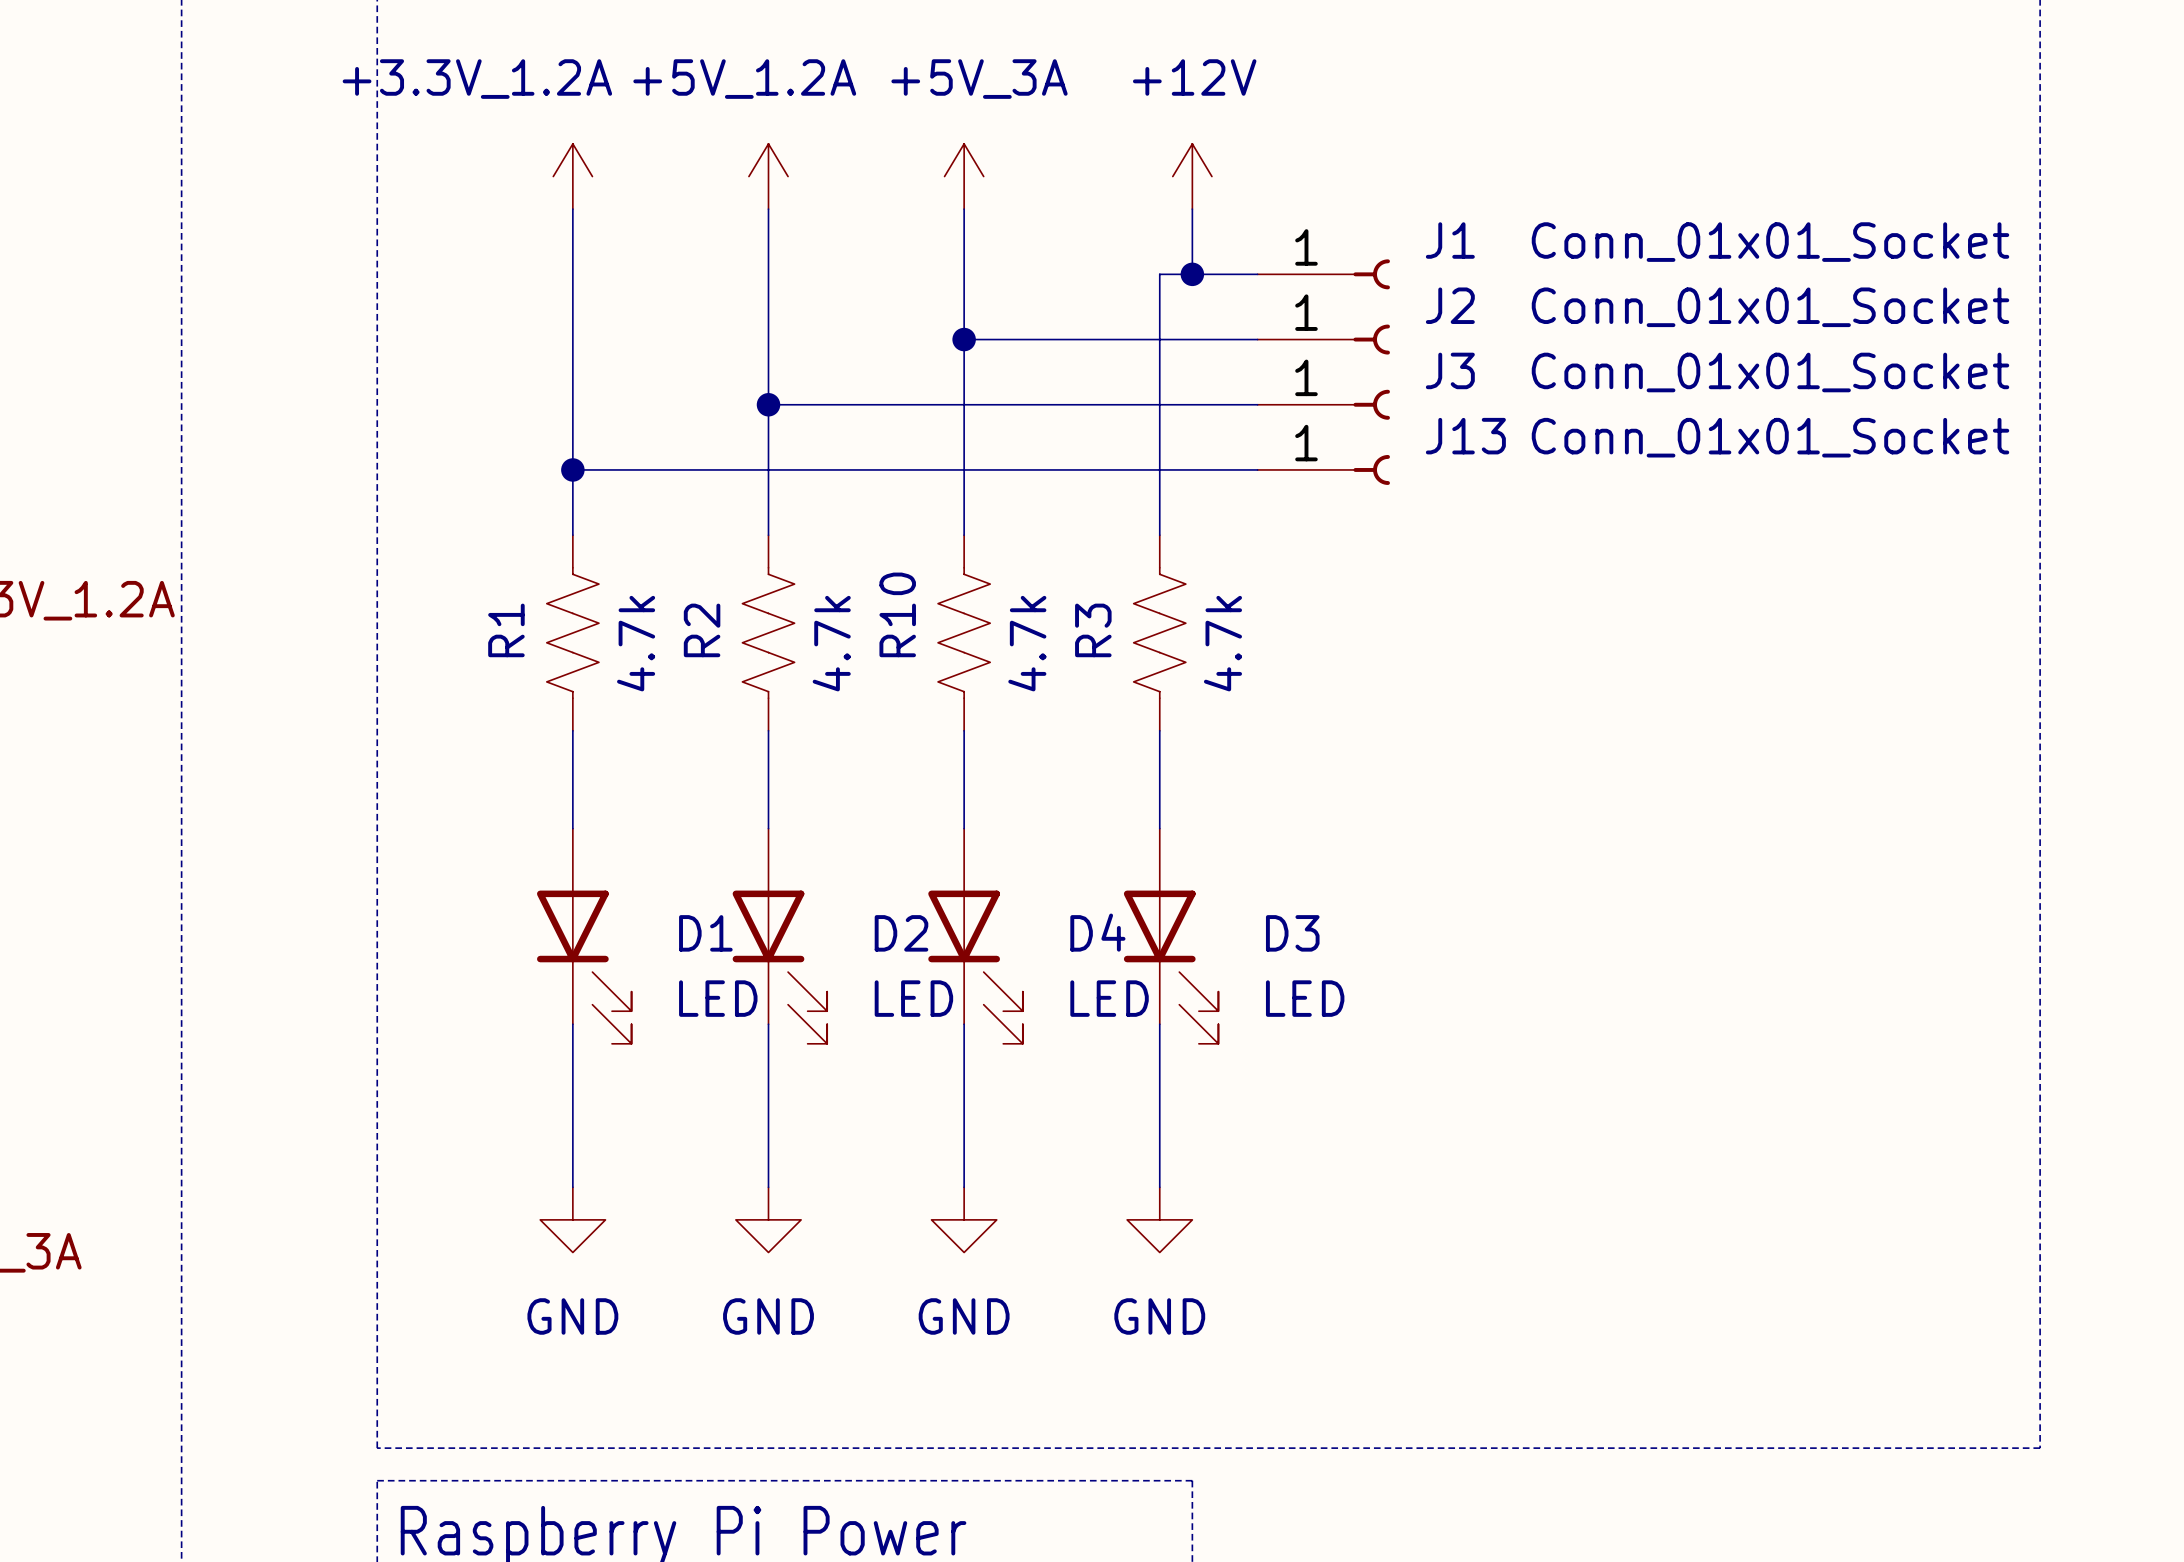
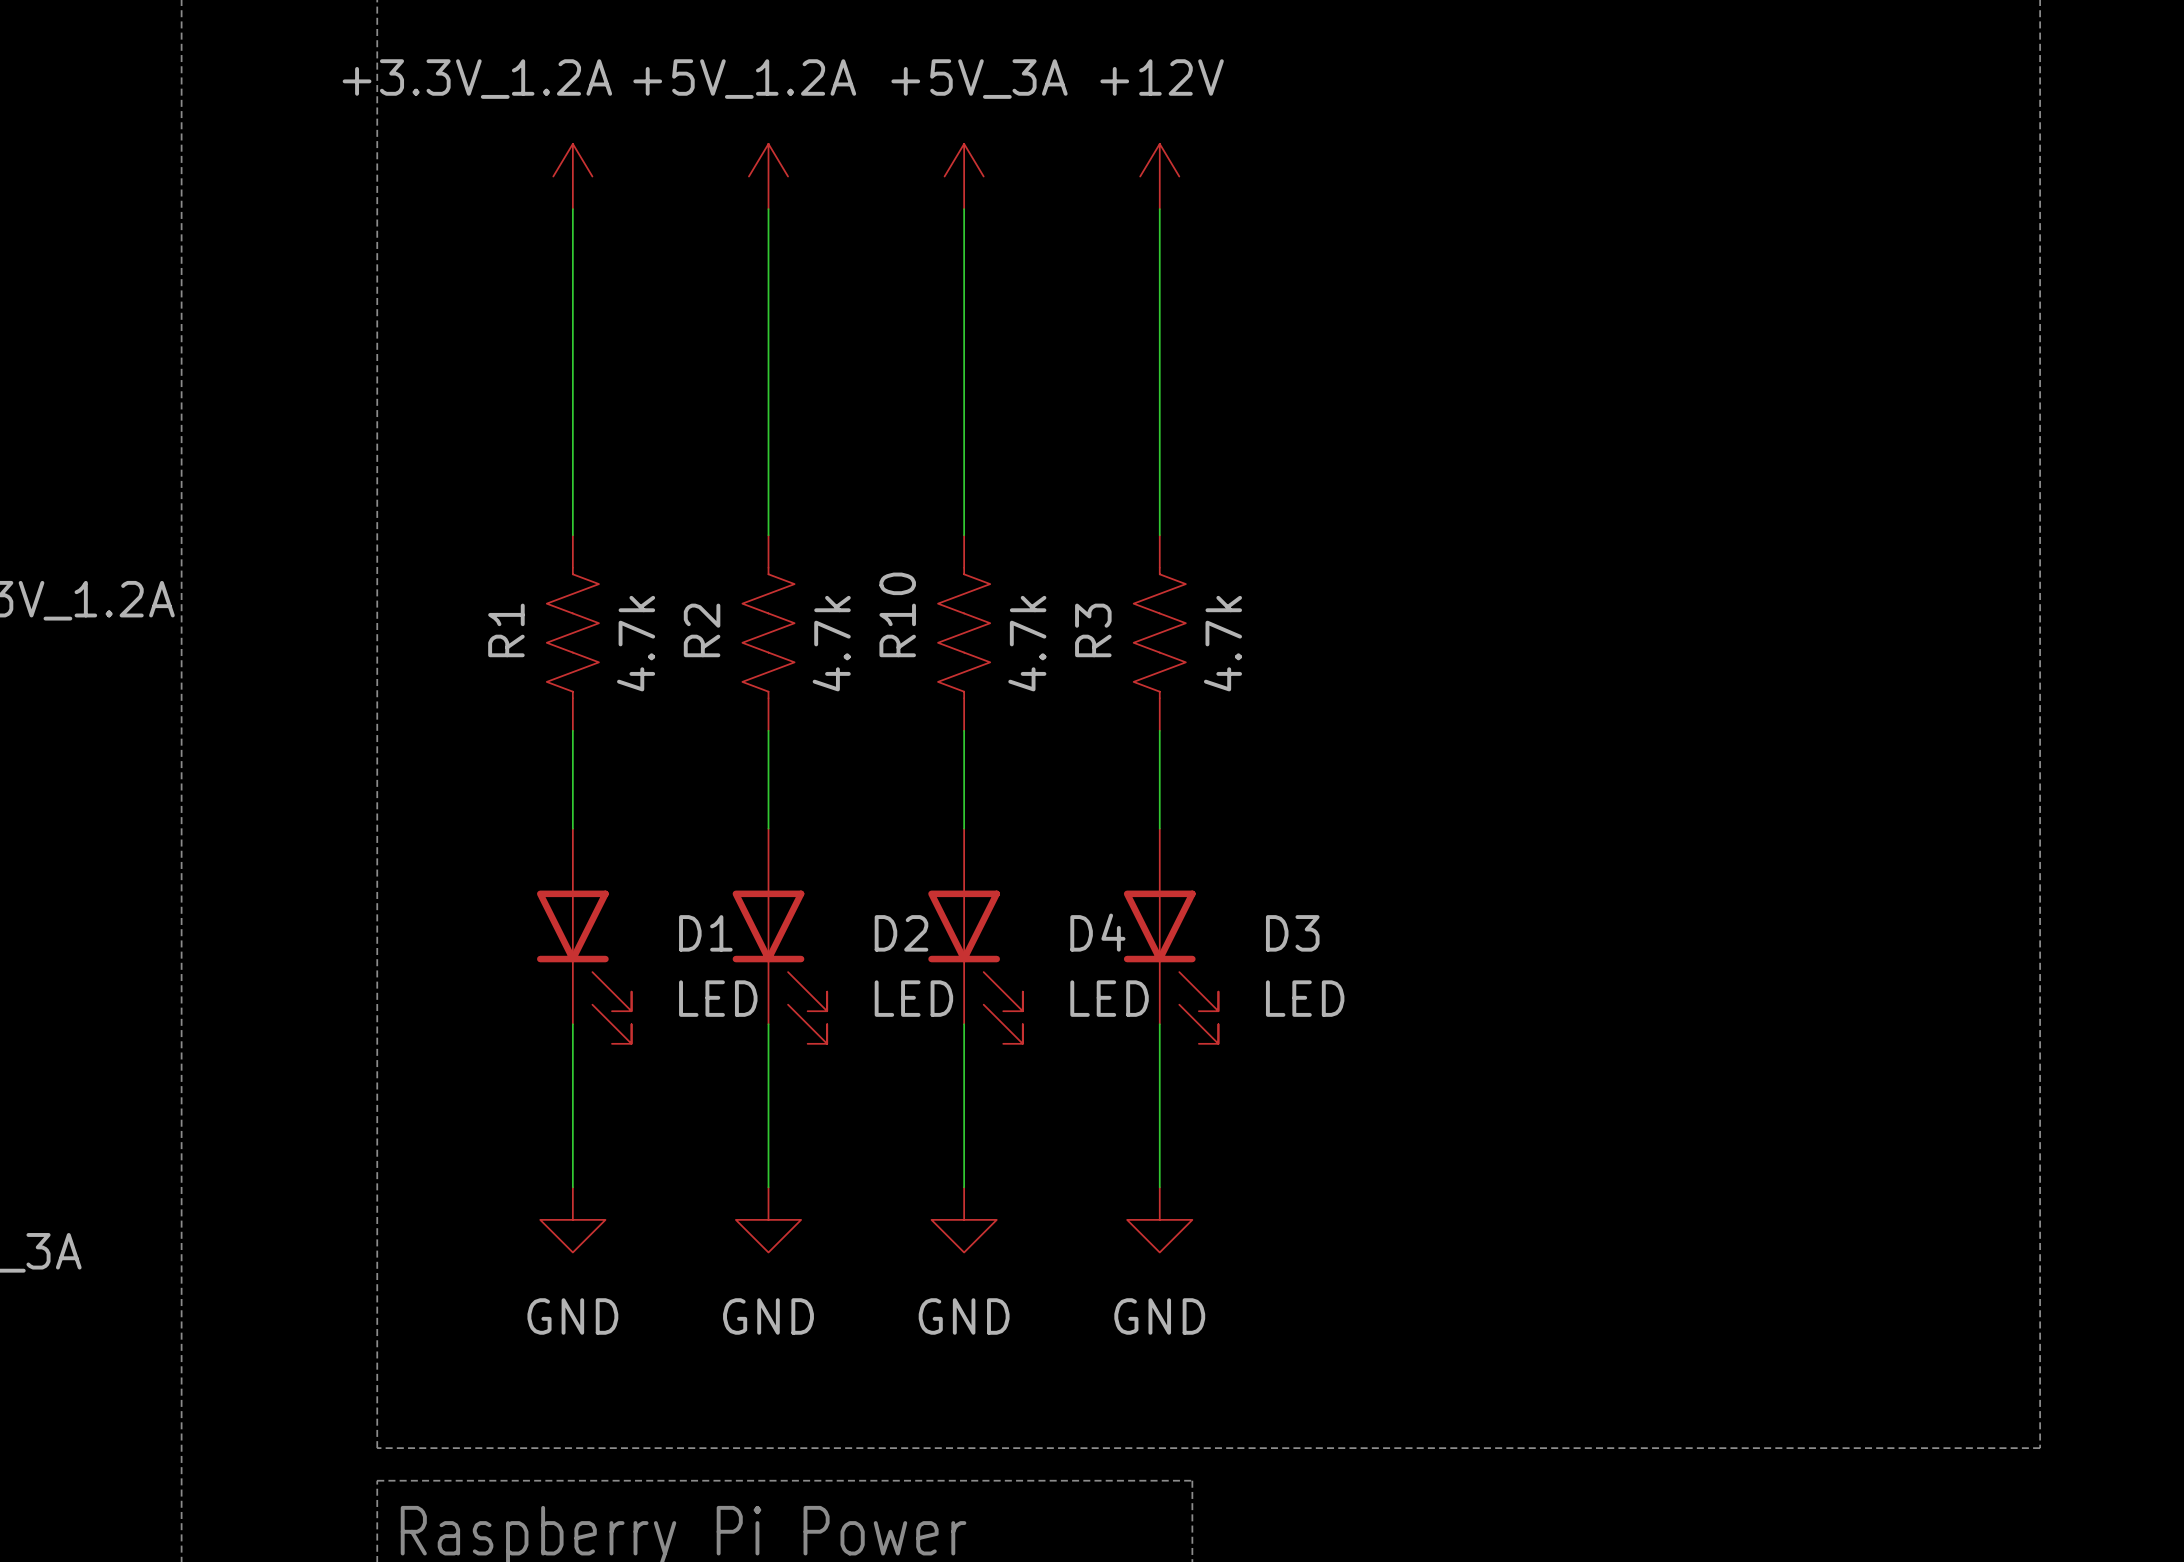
power symbol position: +12V (1192, 176) -> +12V (1159, 176)
wire: (1192, 209) (1192, 274) -> none
wire: (1159, 274) (1257, 274) -> (1159, 274) (1159, 209)
junction: (1192, 274) -> none
J1: Conn_01x01_Socket (1323, 274) -> none
wire: (964, 339) (1257, 339) -> none
junction: (964, 339) -> none
J2: Conn_01x01_Socket (1323, 339) -> none
wire: (768, 404) (1257, 404) -> none
junction: (768, 404) -> none
J3: Conn_01x01_Socket (1323, 404) -> none
wire: (572, 469) (1257, 469) -> none
junction: (572, 469) -> none
J13: Conn_01x01_Socket (1323, 469) -> none

